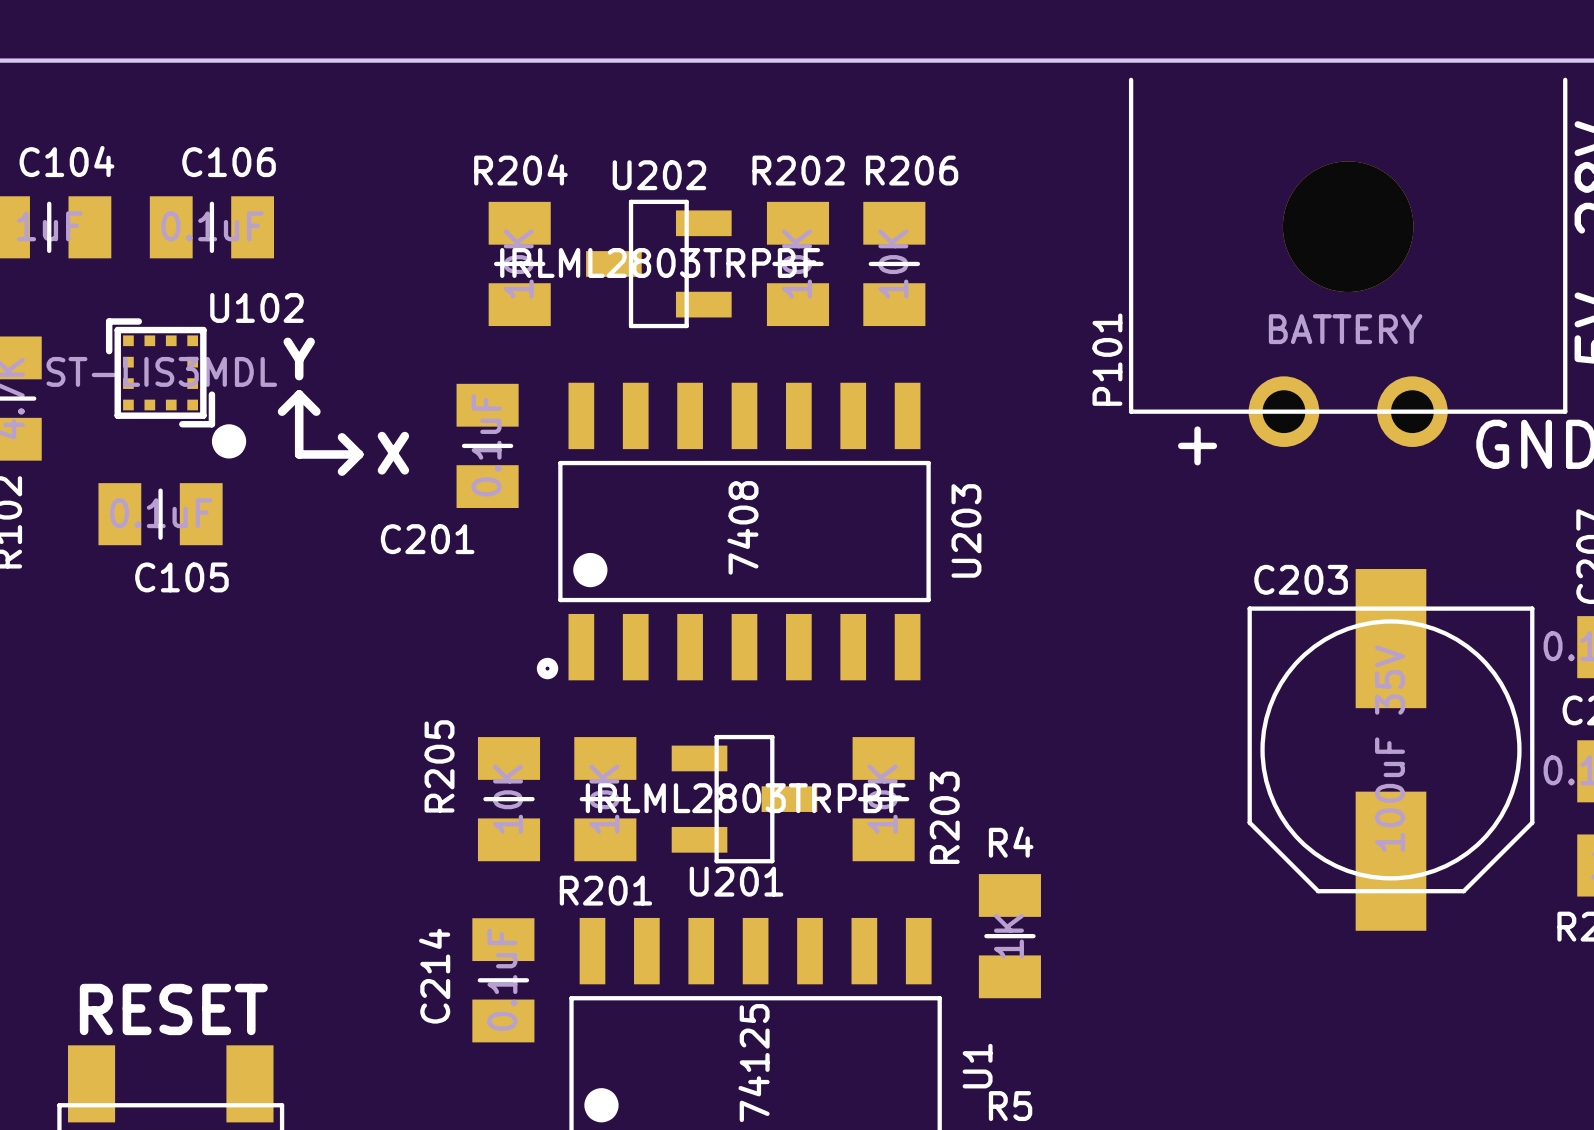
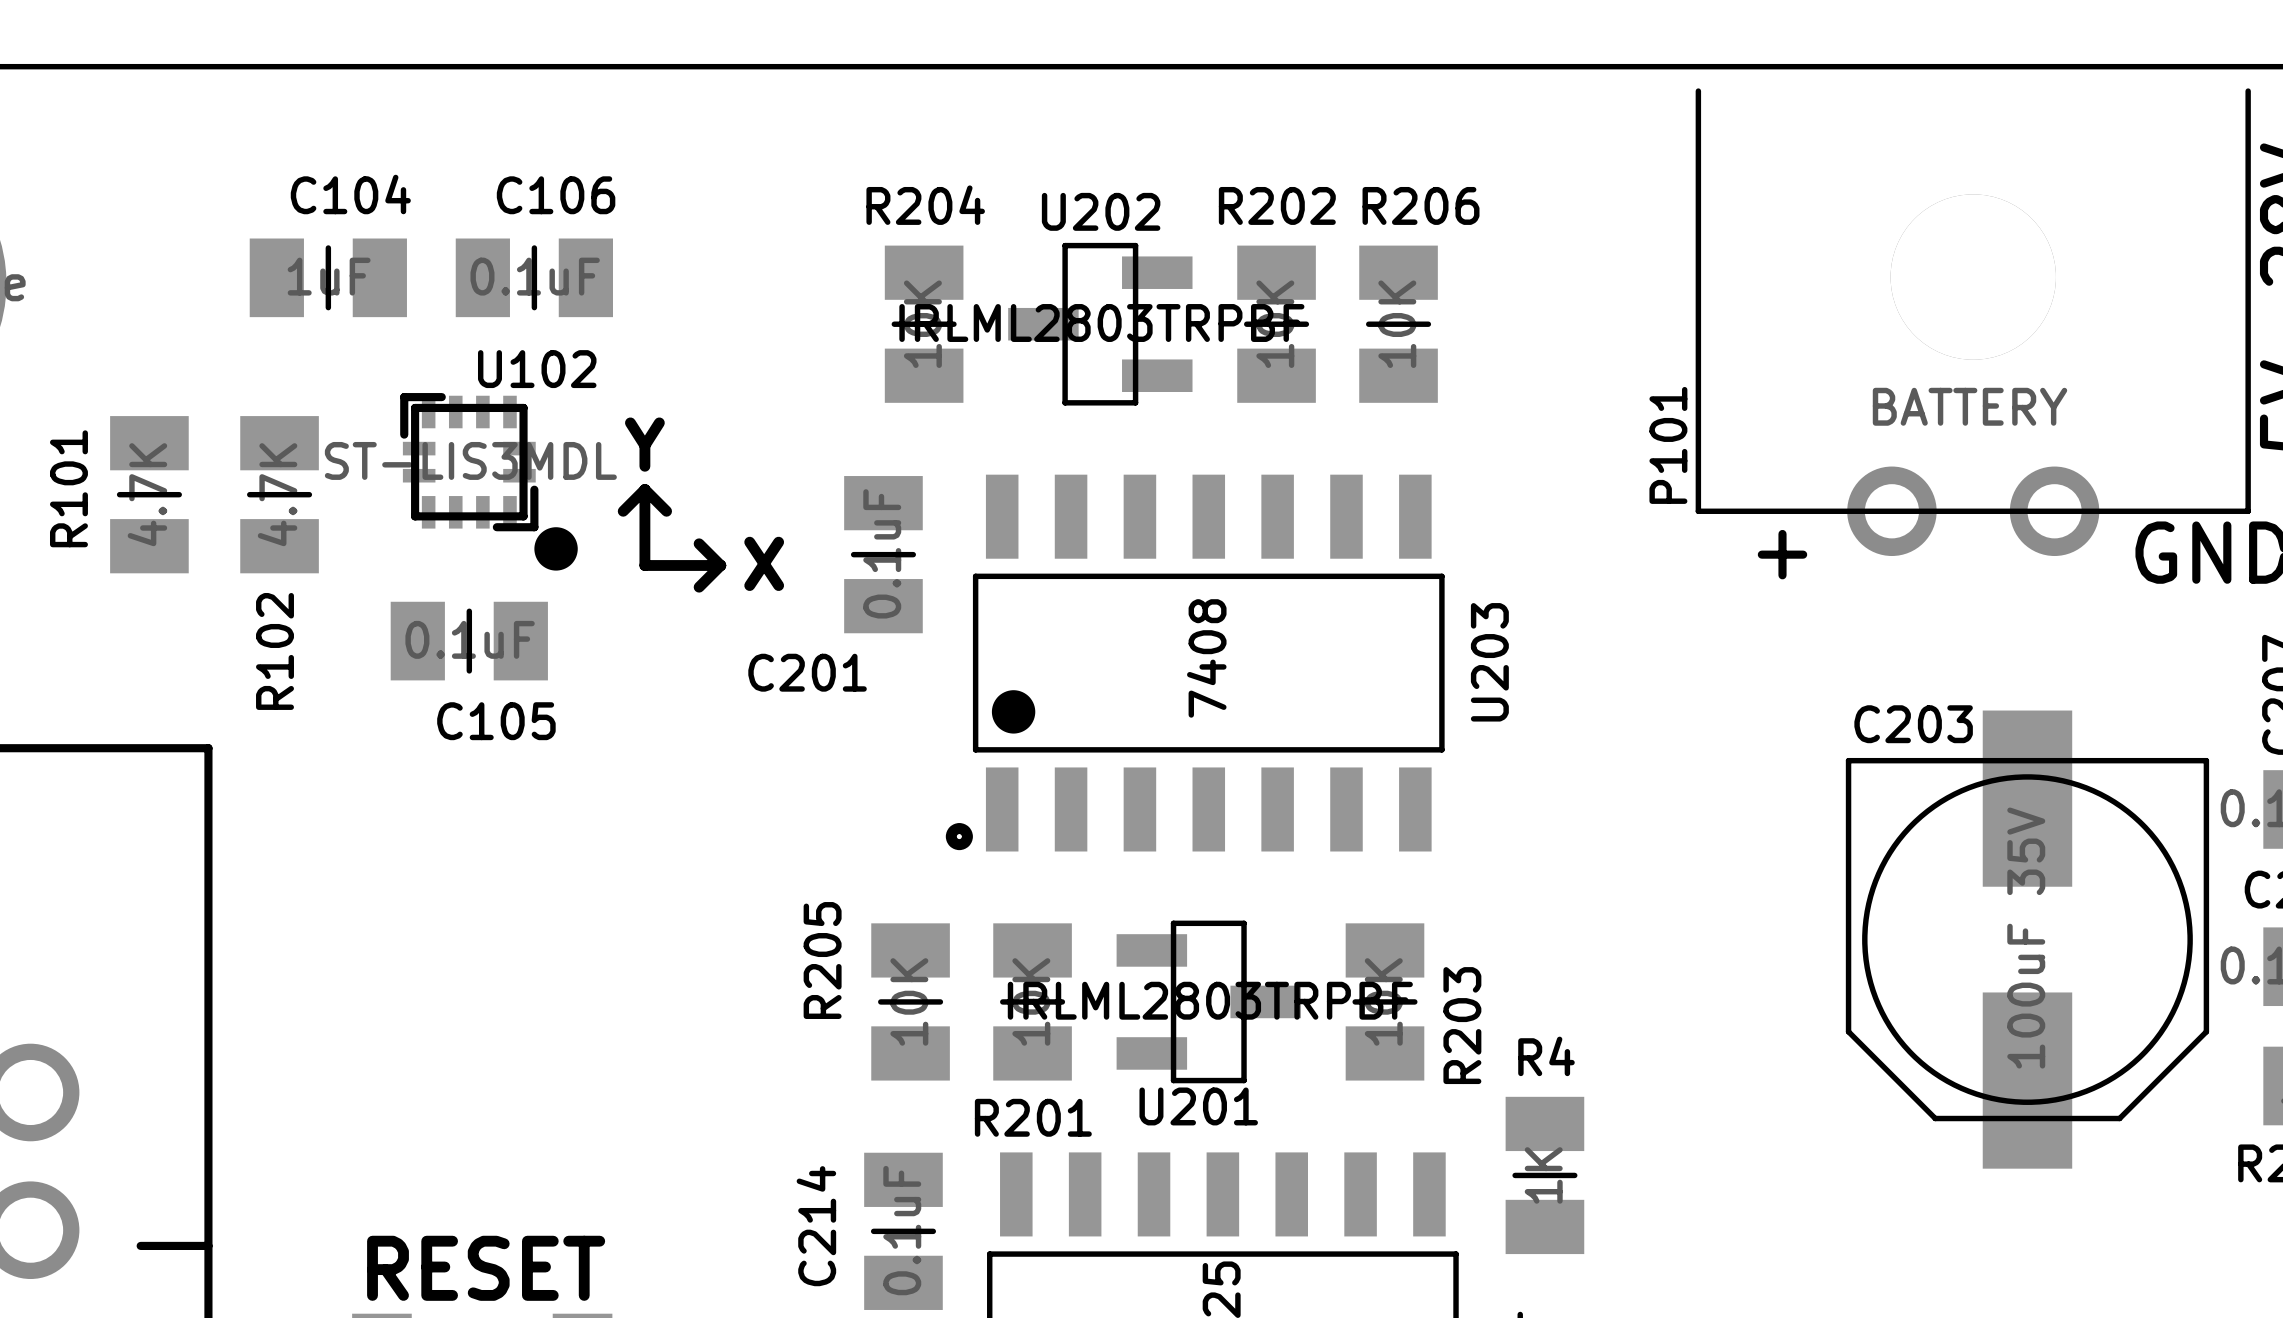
U102 name position: U102 (257, 307) -> U102 (537, 369)
U102 footprint: [105, 318, 247, 459] -> [400, 393, 578, 571]

